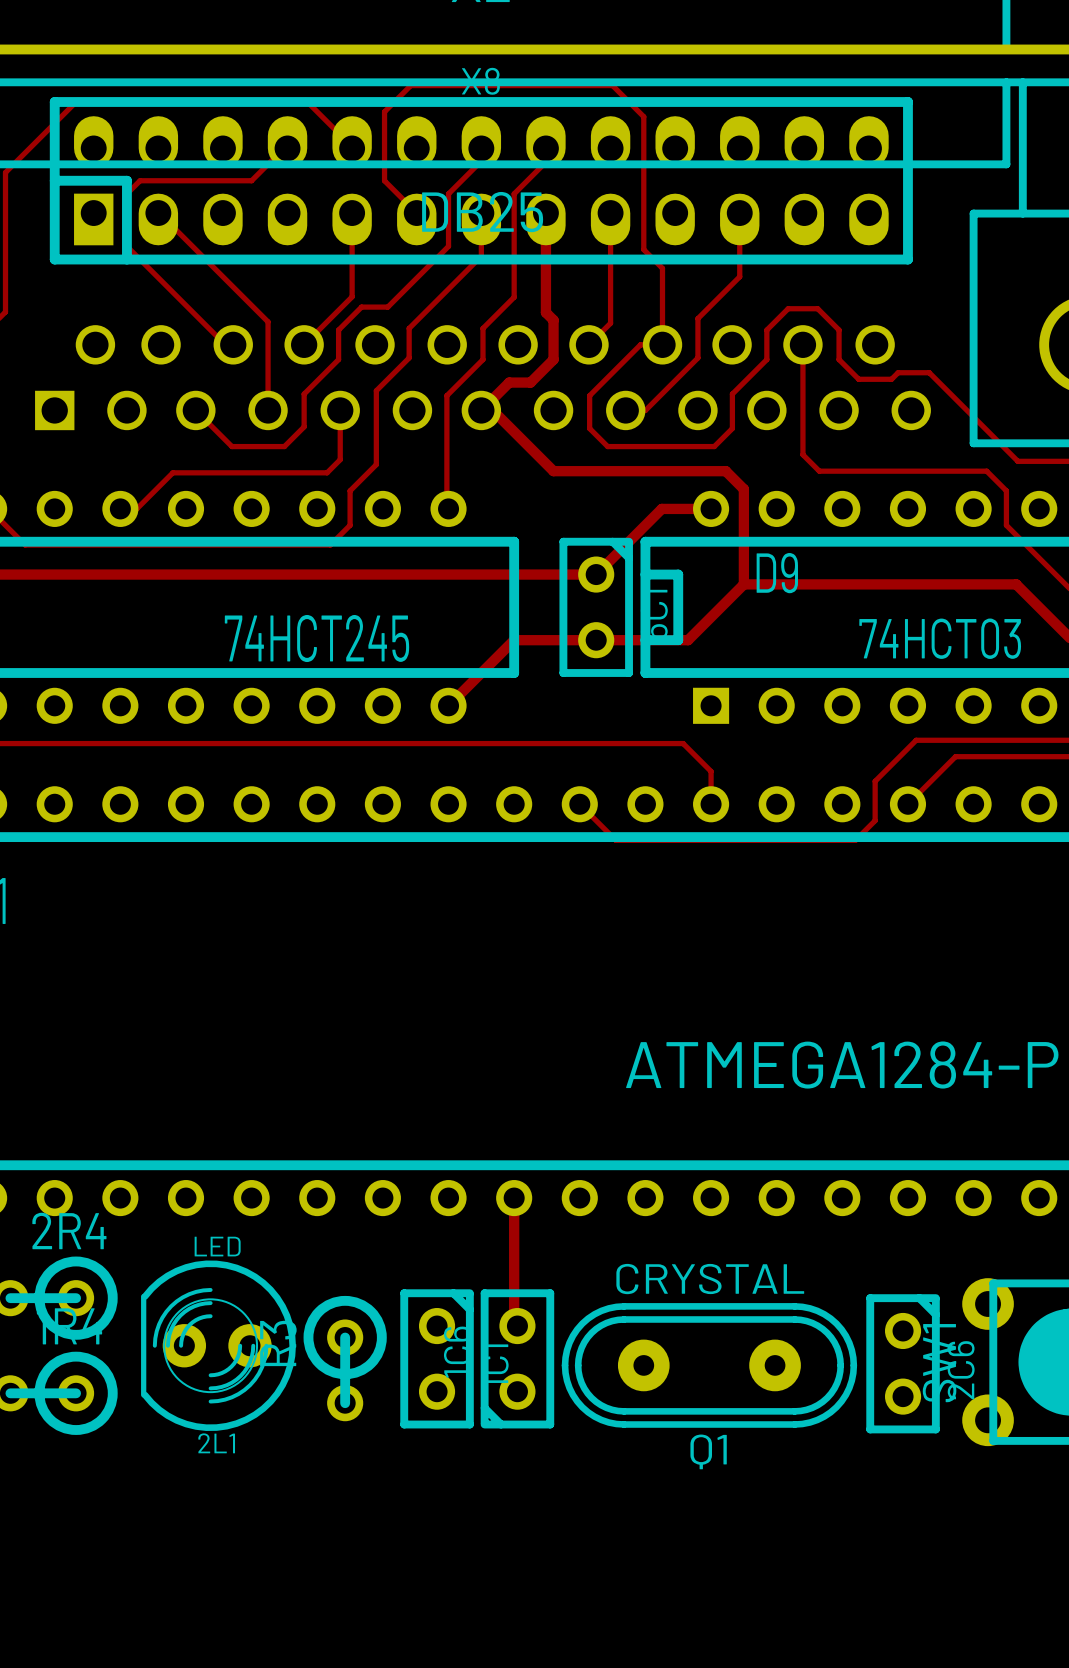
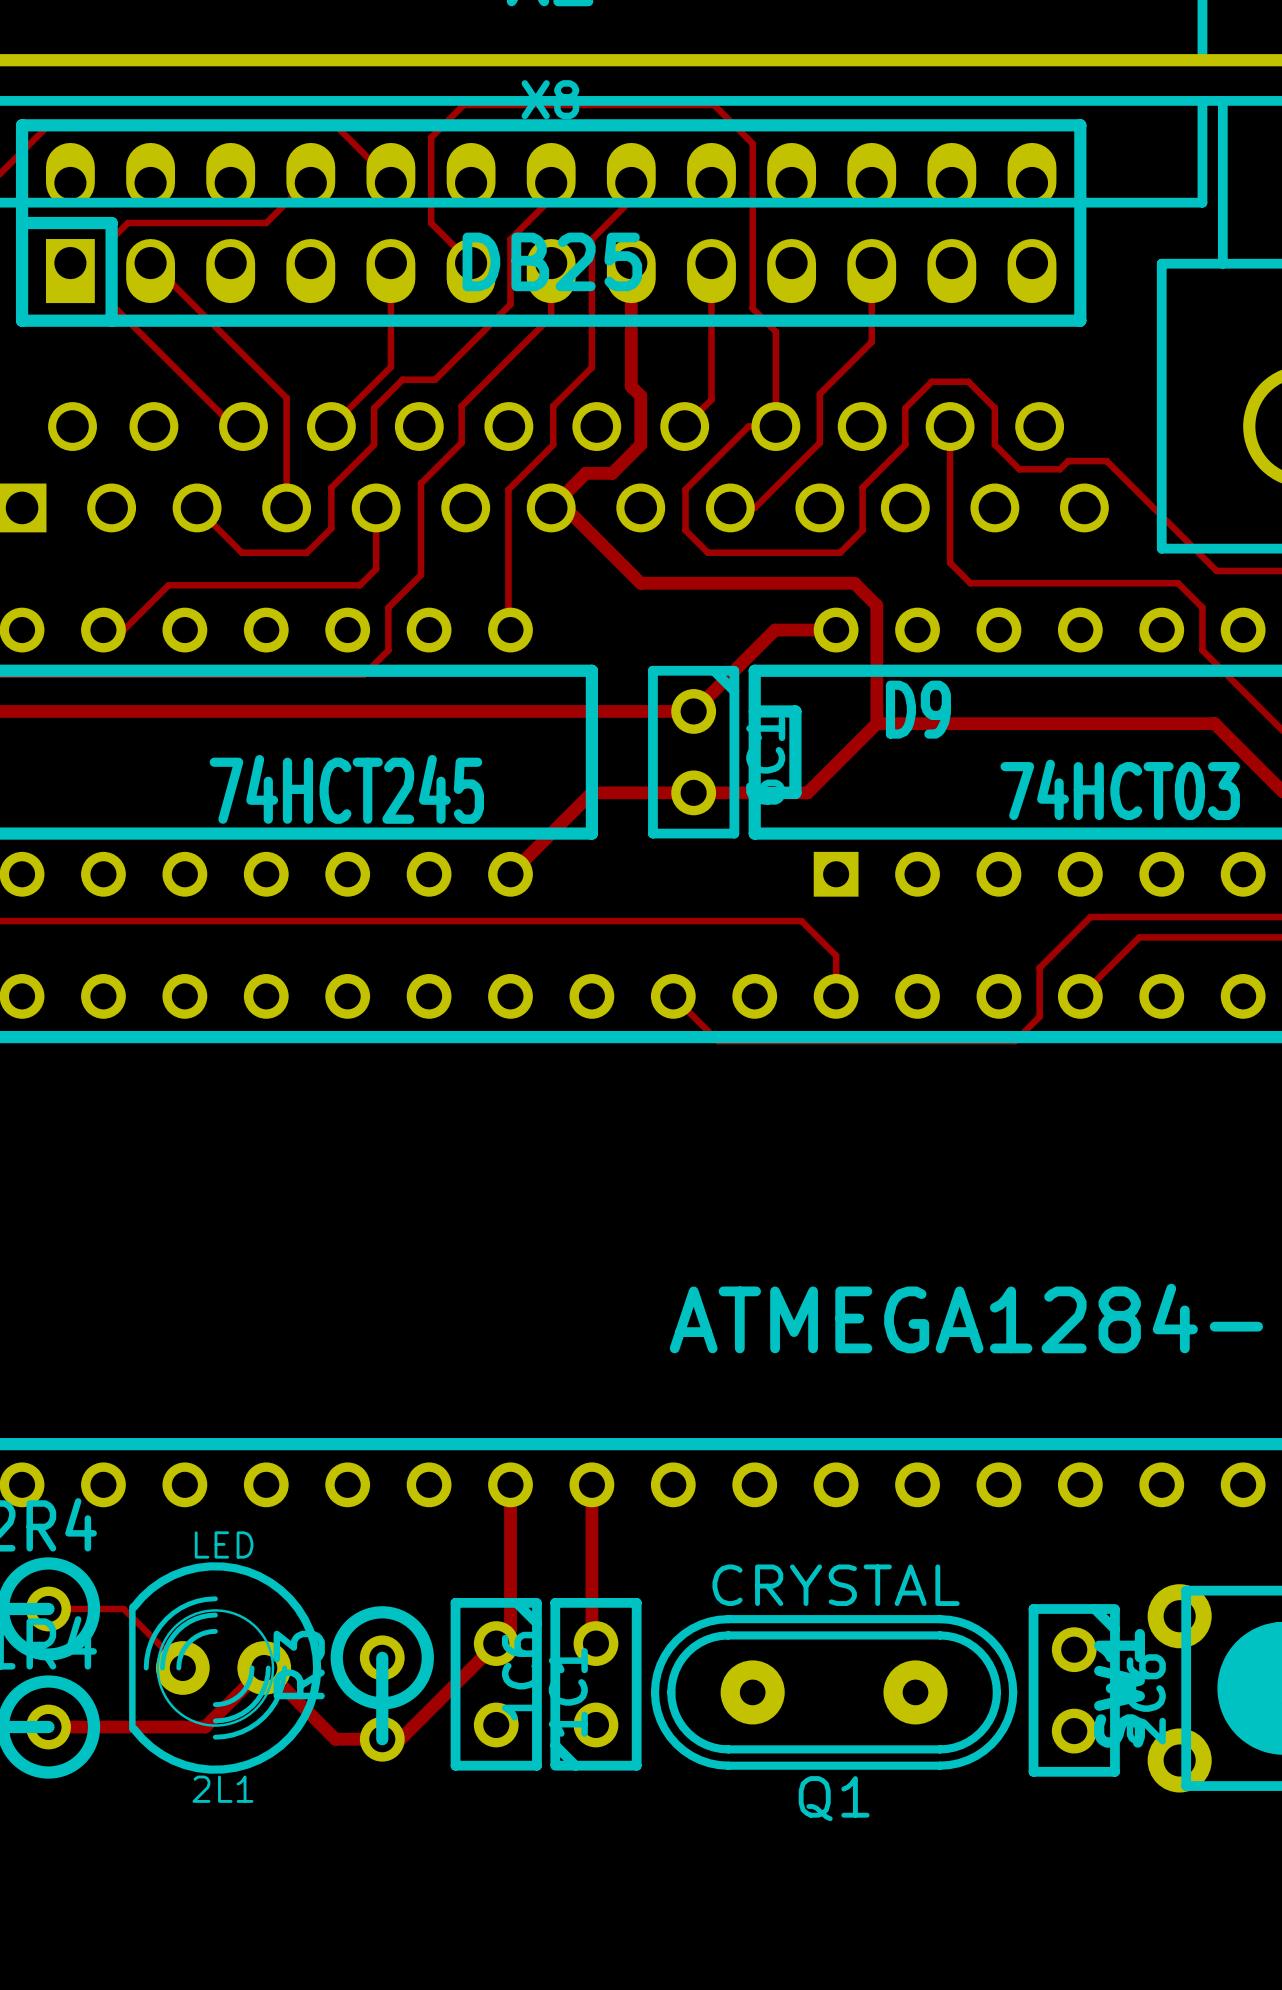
track: none -> (510, 1484) (510, 1629) (400, 1739) (335, 1739) (264, 1668) (205, 1727) (48, 1727)
track: none -> (48, 1608) (123, 1608) (182, 1668)

